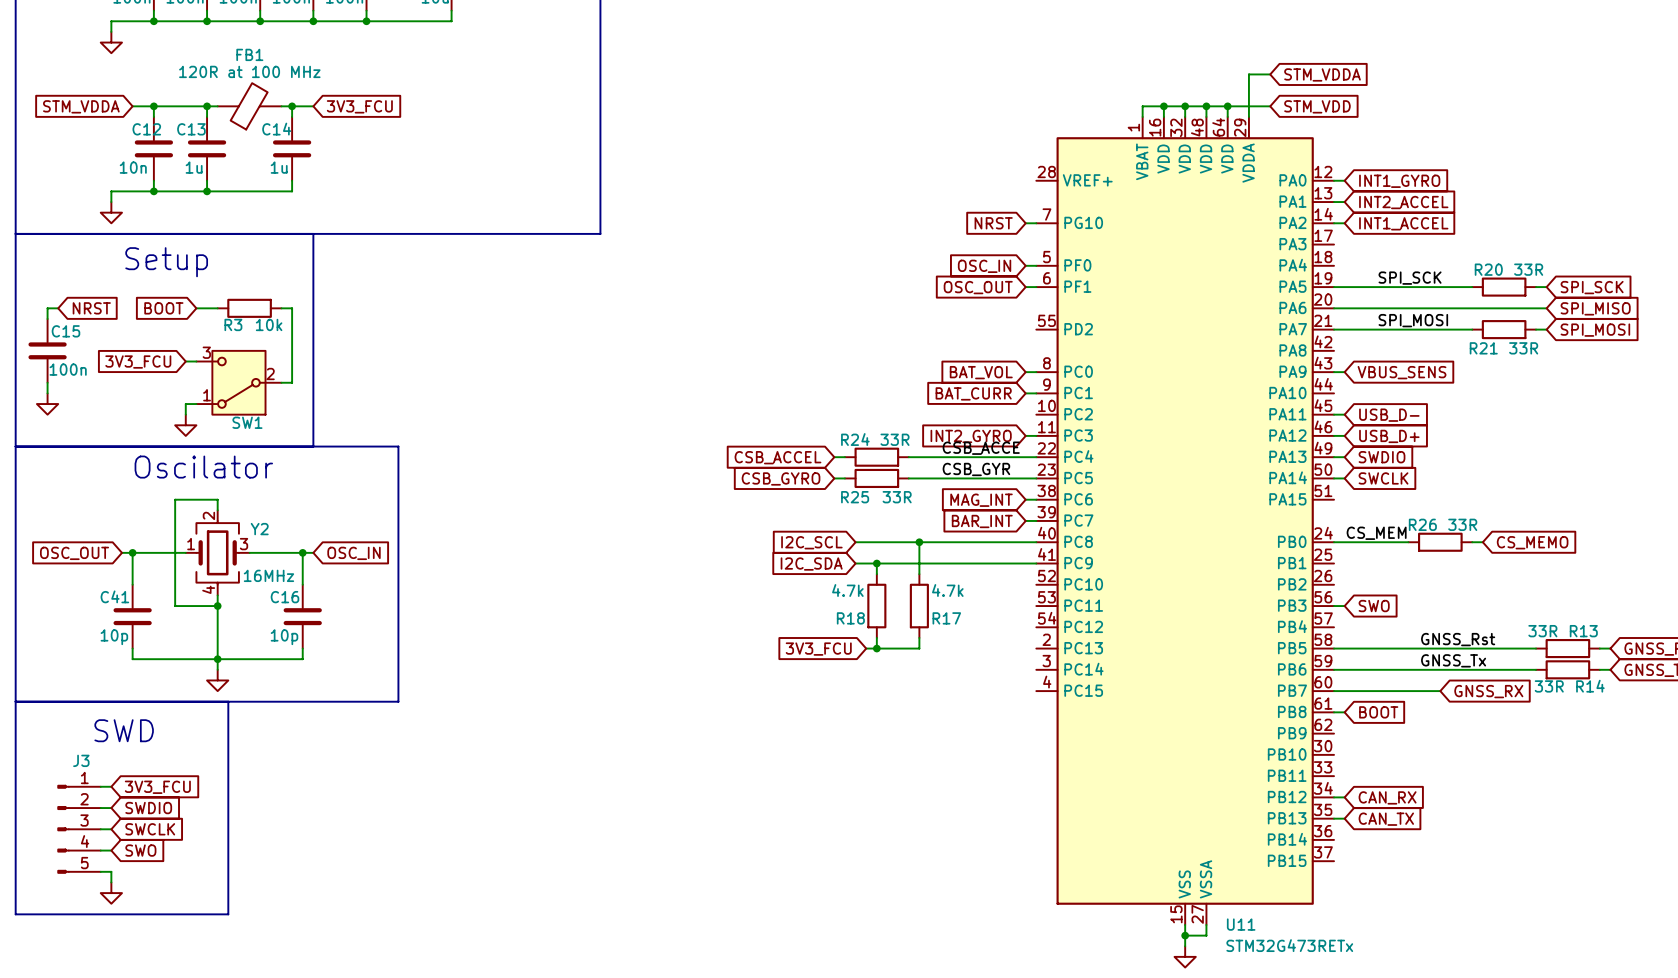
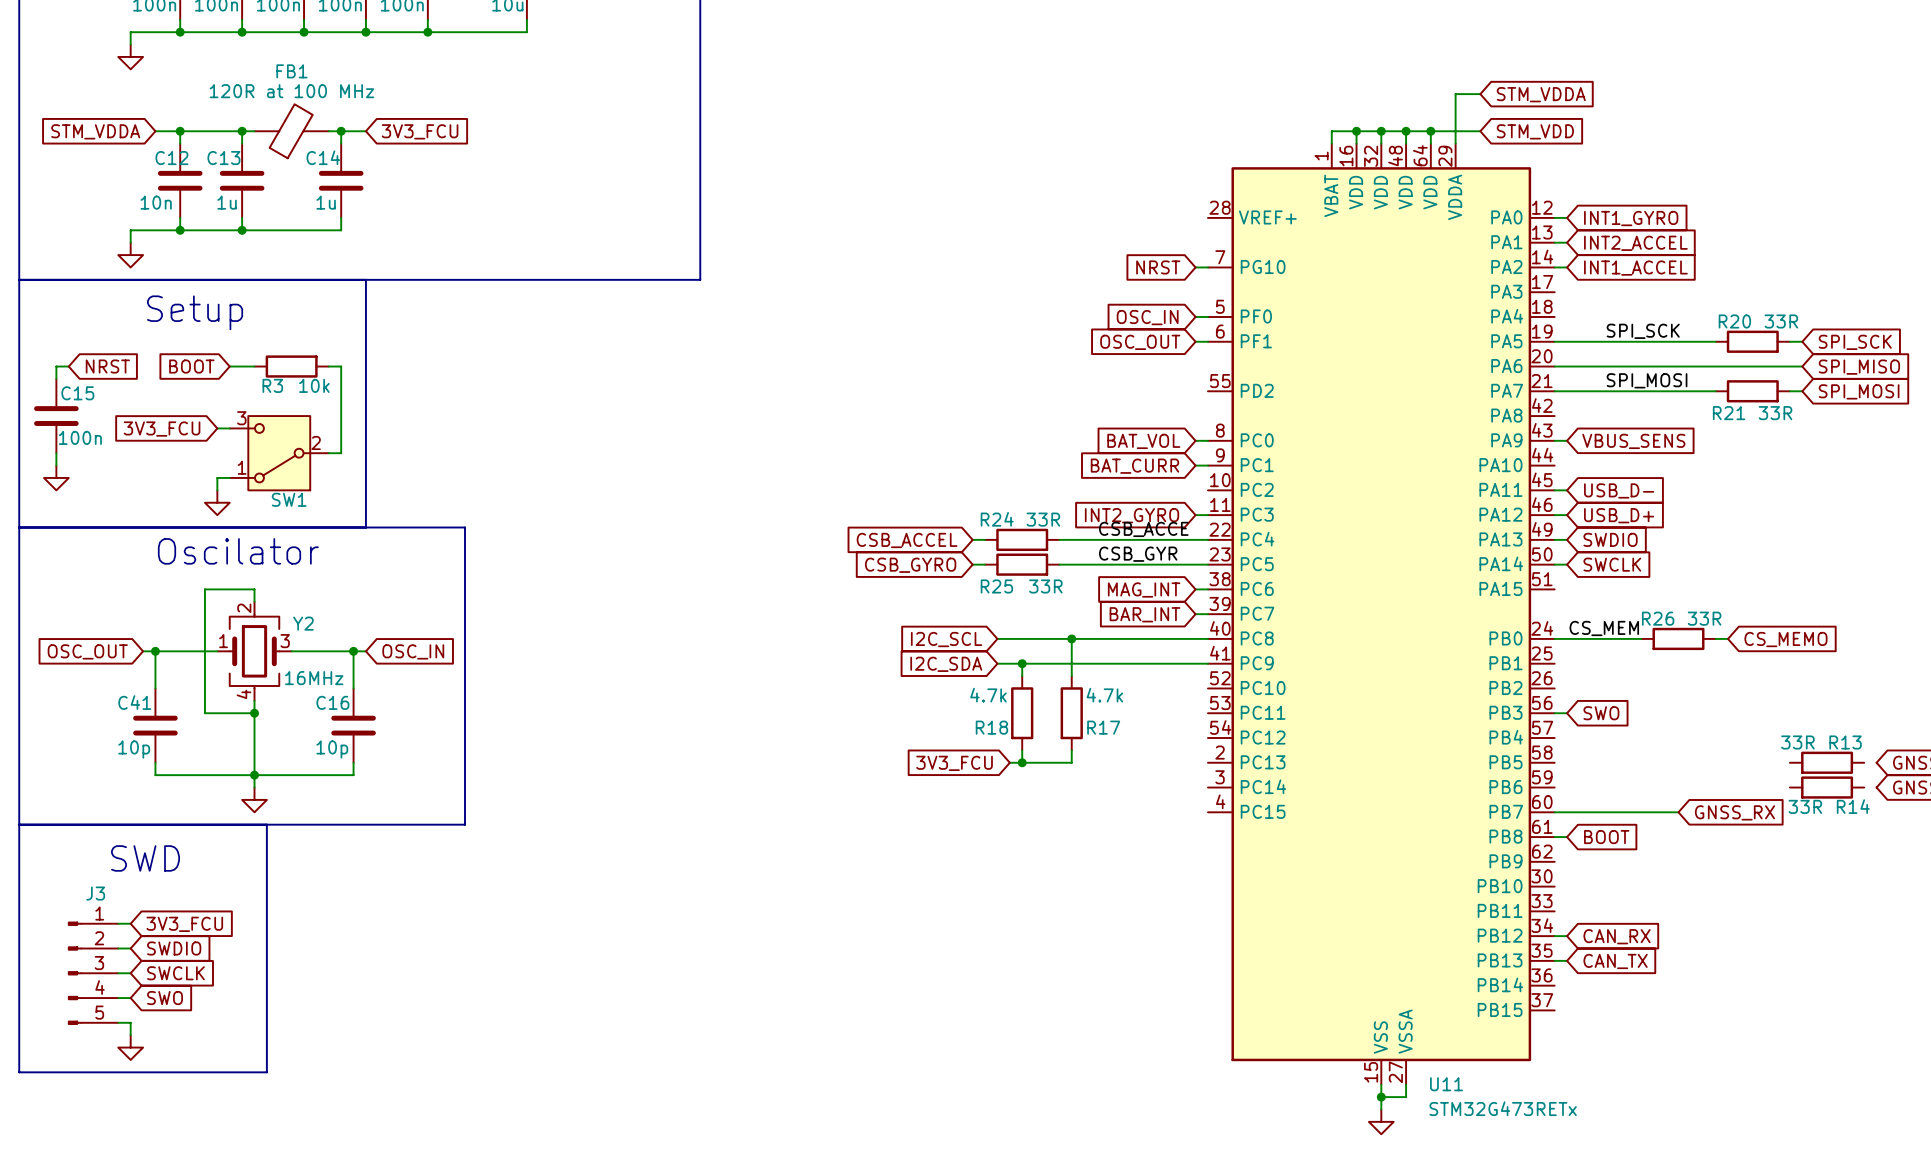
label: GNSS_Rst (1458, 639) -> none
wire: (1334, 648) (1536, 648) -> none
wire: (1599, 648) (1610, 648) -> none
label: GNSS_Tx (1453, 660) -> none
wire: (1334, 669) (1536, 669) -> none
wire: (1599, 669) (1610, 669) -> none

